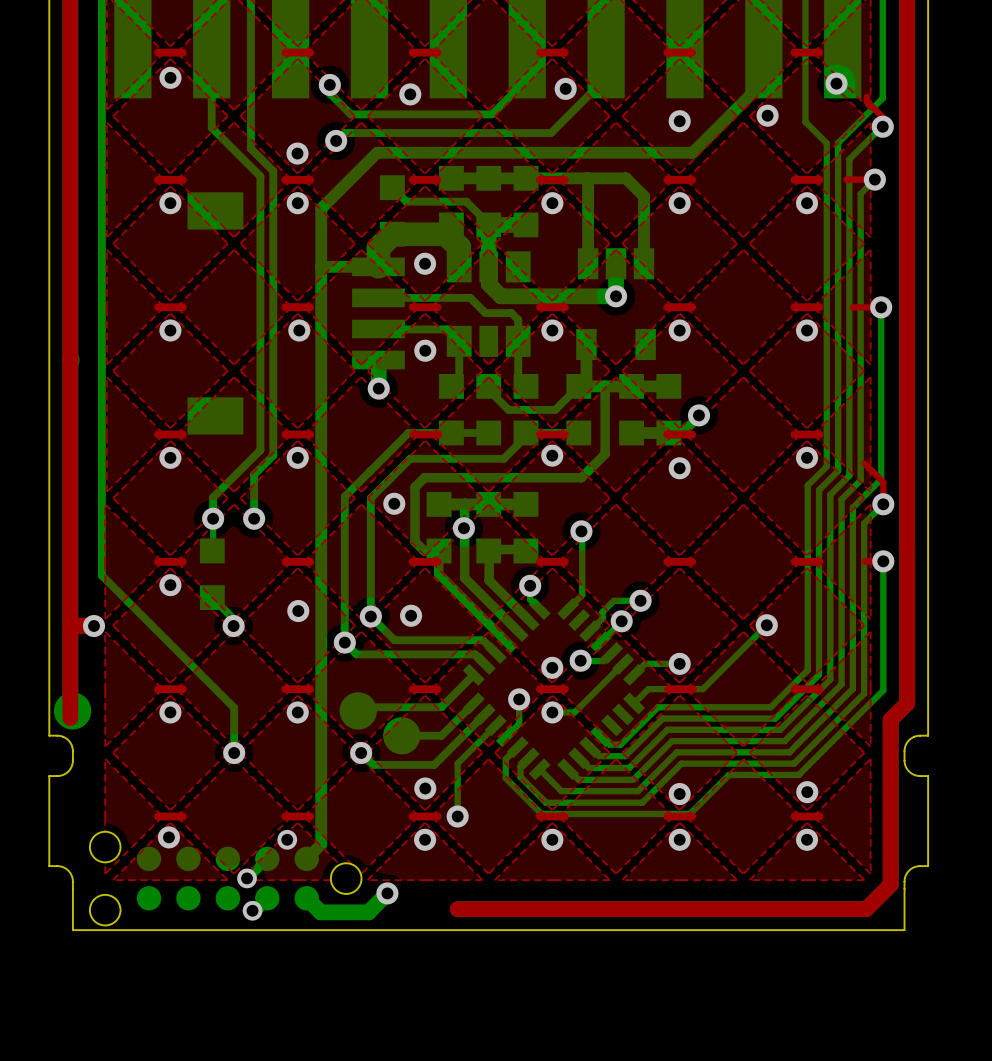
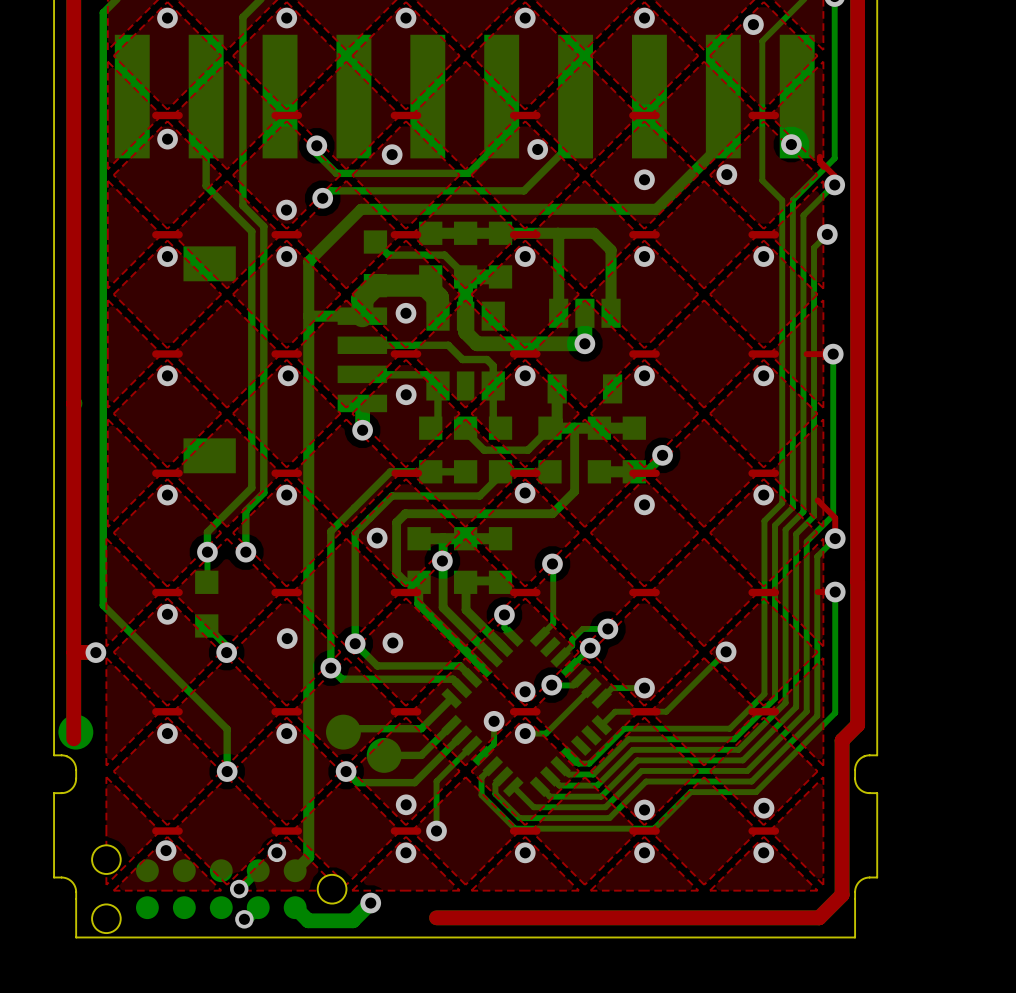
top track: (846, 179) (874, 179) -> none

